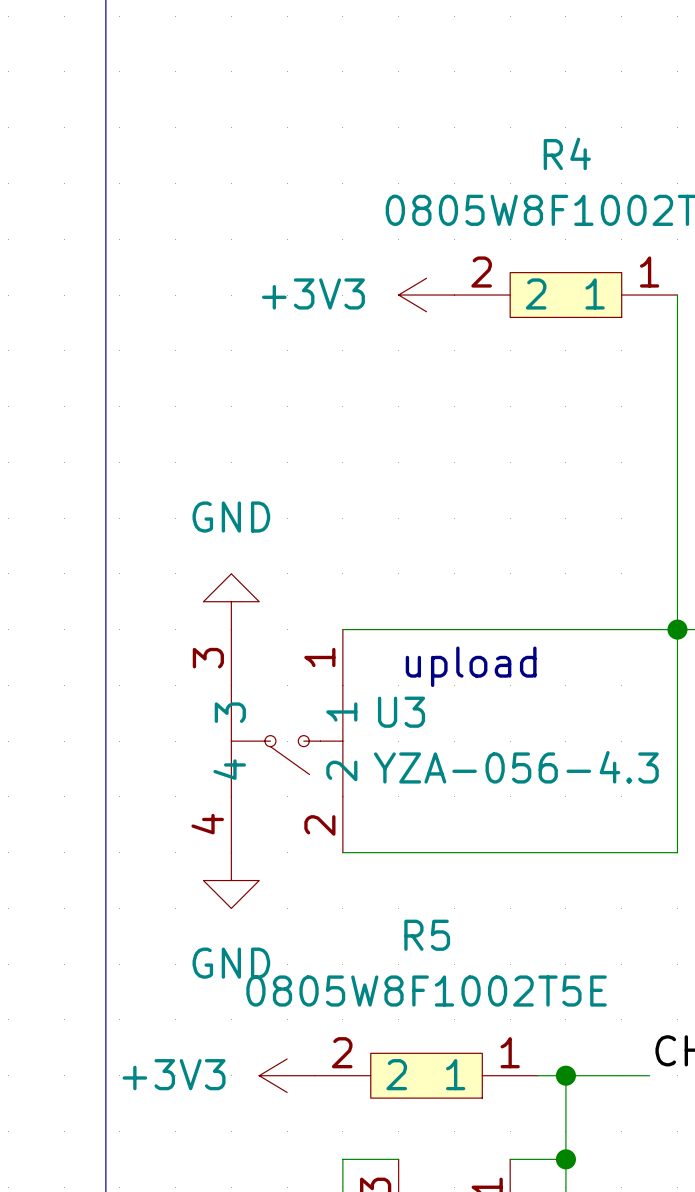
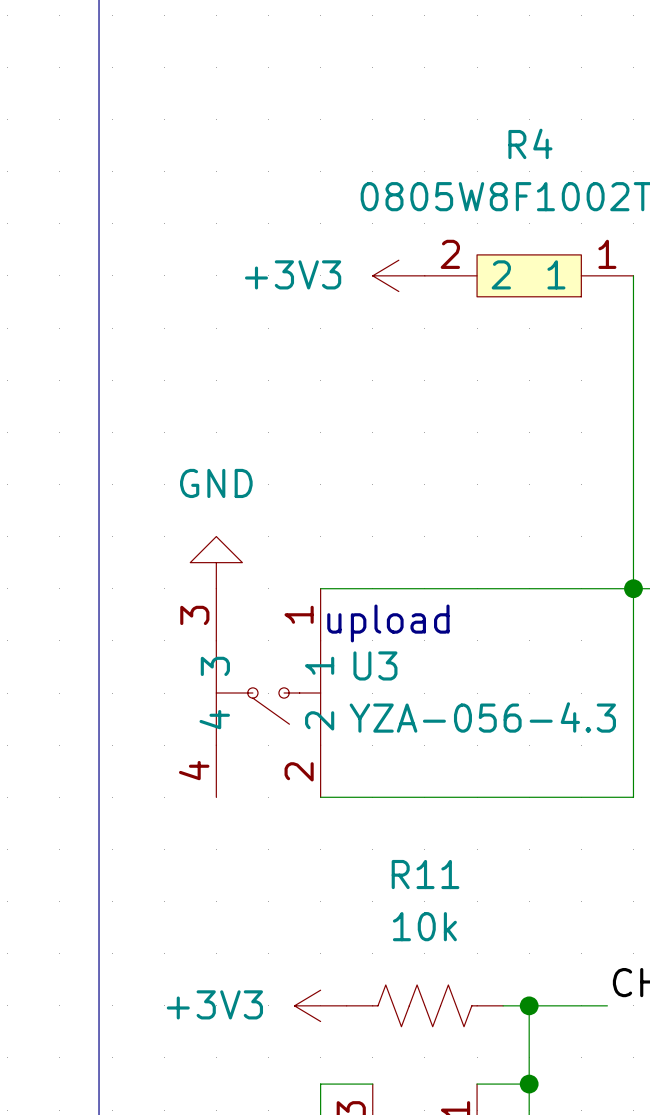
text position: upload (471, 666) -> upload (388, 623)
power symbol: GND (231, 880) -> none
power symbol position: +3V3 (287, 1075) -> +3V3 (320, 1005)
R5: 0805W8F1002T5E (426, 1075) -> none
R11: none -> 10k (424, 1005)

